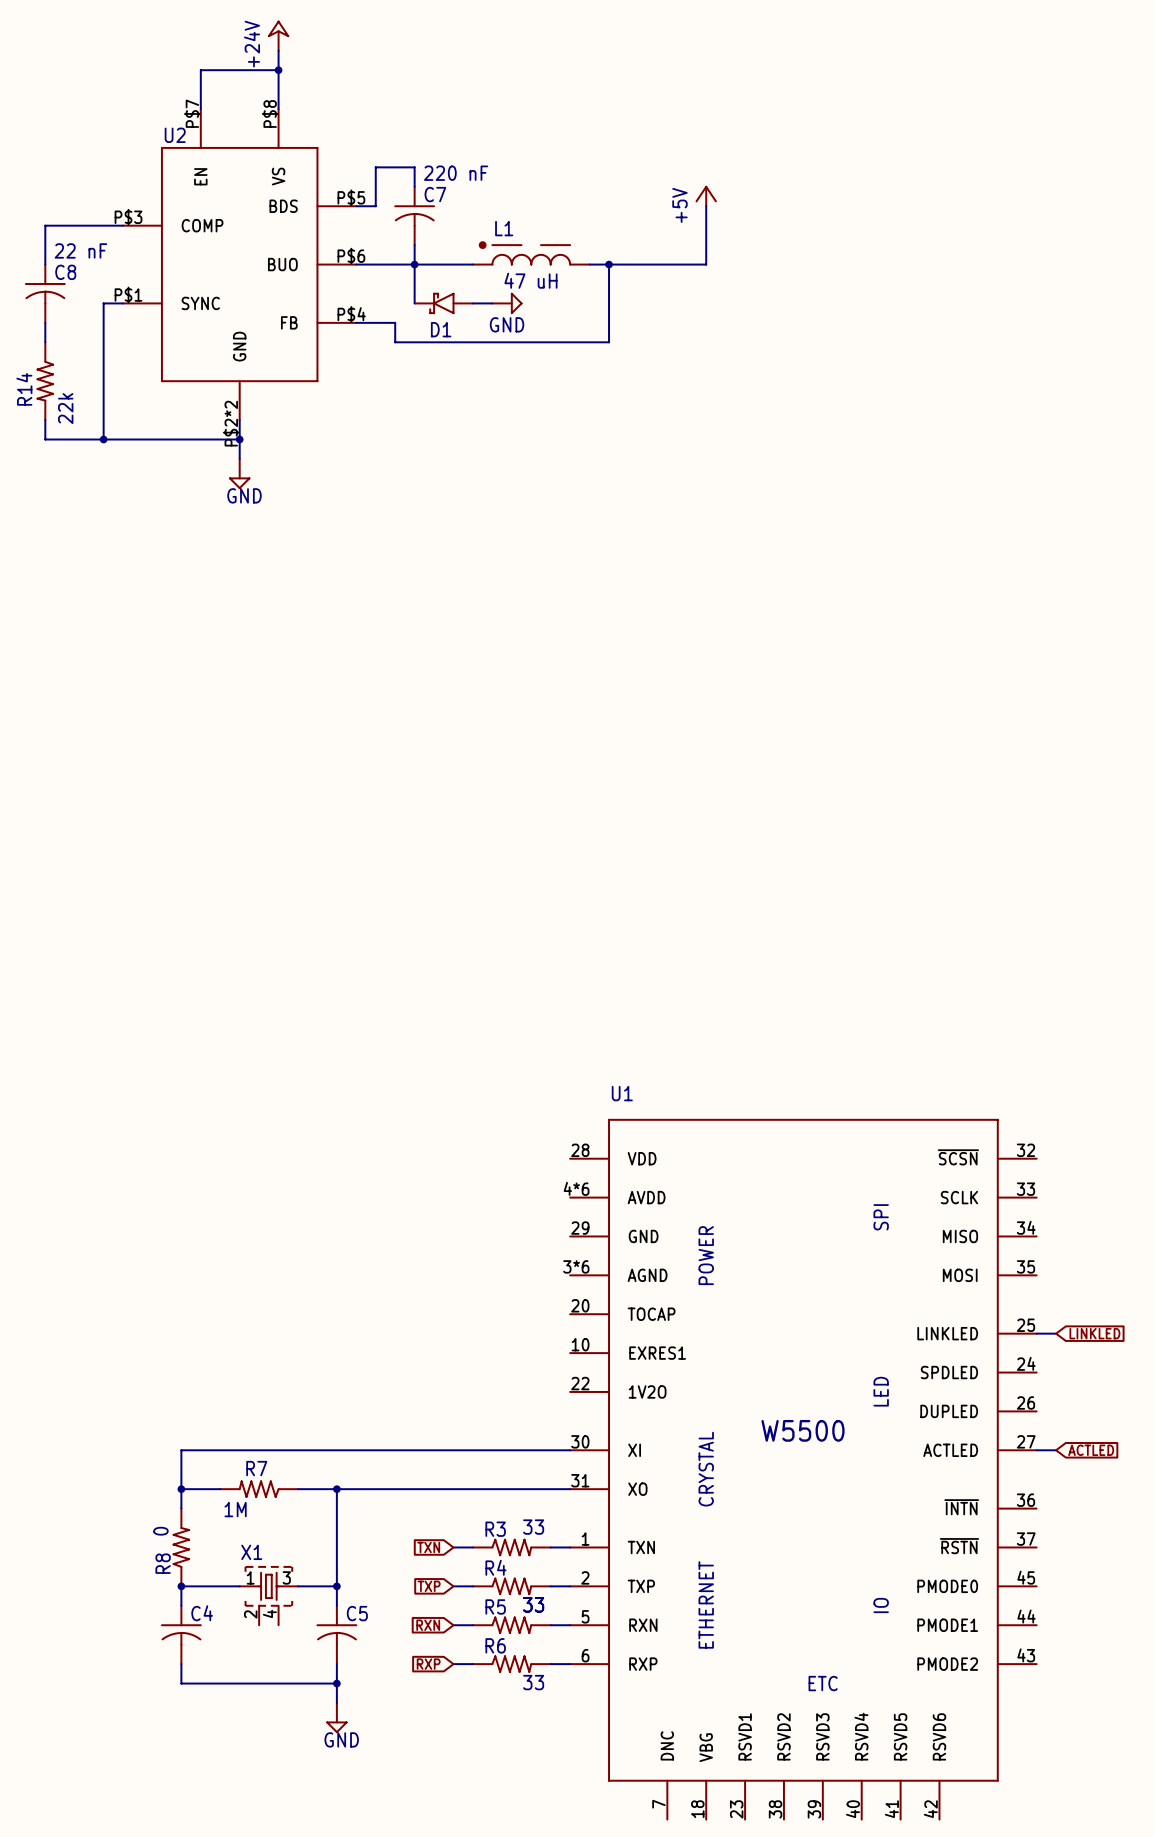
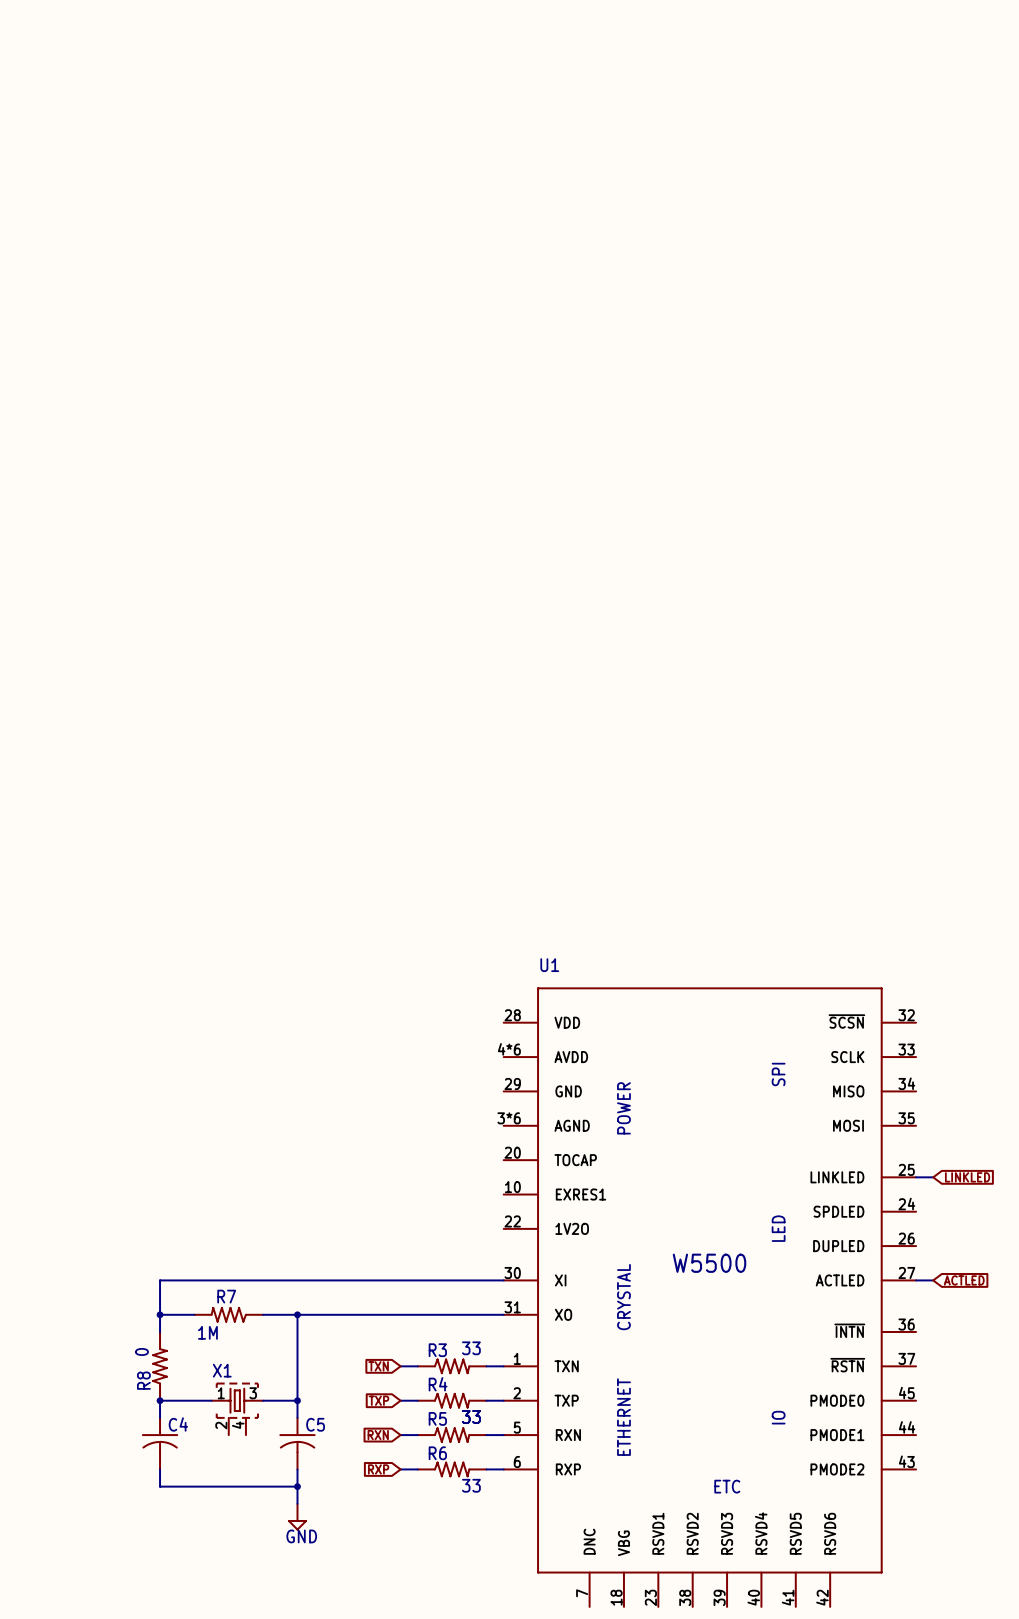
power symbol: +24V (278, 35) -> none
wire: (278, 50) (278, 109) -> none
wire: (278, 70) (200, 70) (200, 109) -> none
junction: (278, 70) -> none
wire: (414, 186) (414, 167) (375, 167) (375, 206) (356, 206) -> none
power symbol: +5V (706, 196) -> none
wire: (706, 206) (706, 264) (589, 264) -> none
C7: 220 nF (414, 215) -> none
wire: (123, 225) (45, 225) (45, 264) -> none
wire: (414, 245) (414, 303) -> none
L1: 47 uH (531, 253) -> none
U2: (239, 264) -> none
wire: (356, 264) (472, 264) -> none
junction: (414, 264) -> none
wire: (609, 264) (609, 342) (395, 342) (395, 322) (356, 322) -> none
junction: (609, 264) -> none
C8: 22 nF (45, 293) -> none
wire: (123, 303) (103, 303) (103, 439) -> none
D1: (443, 303) -> none
wire: (472, 303) (492, 303) -> none
power symbol: GND (507, 303) -> none
wire: (45, 322) (45, 342) -> none
R14: 22k (45, 381) -> none
wire: (45, 420) (45, 439) (239, 439) -> none
wire: (239, 420) (239, 458) -> none
junction: (103, 439) -> none
junction: (239, 439) -> none
power symbol: GND (239, 474) -> none

